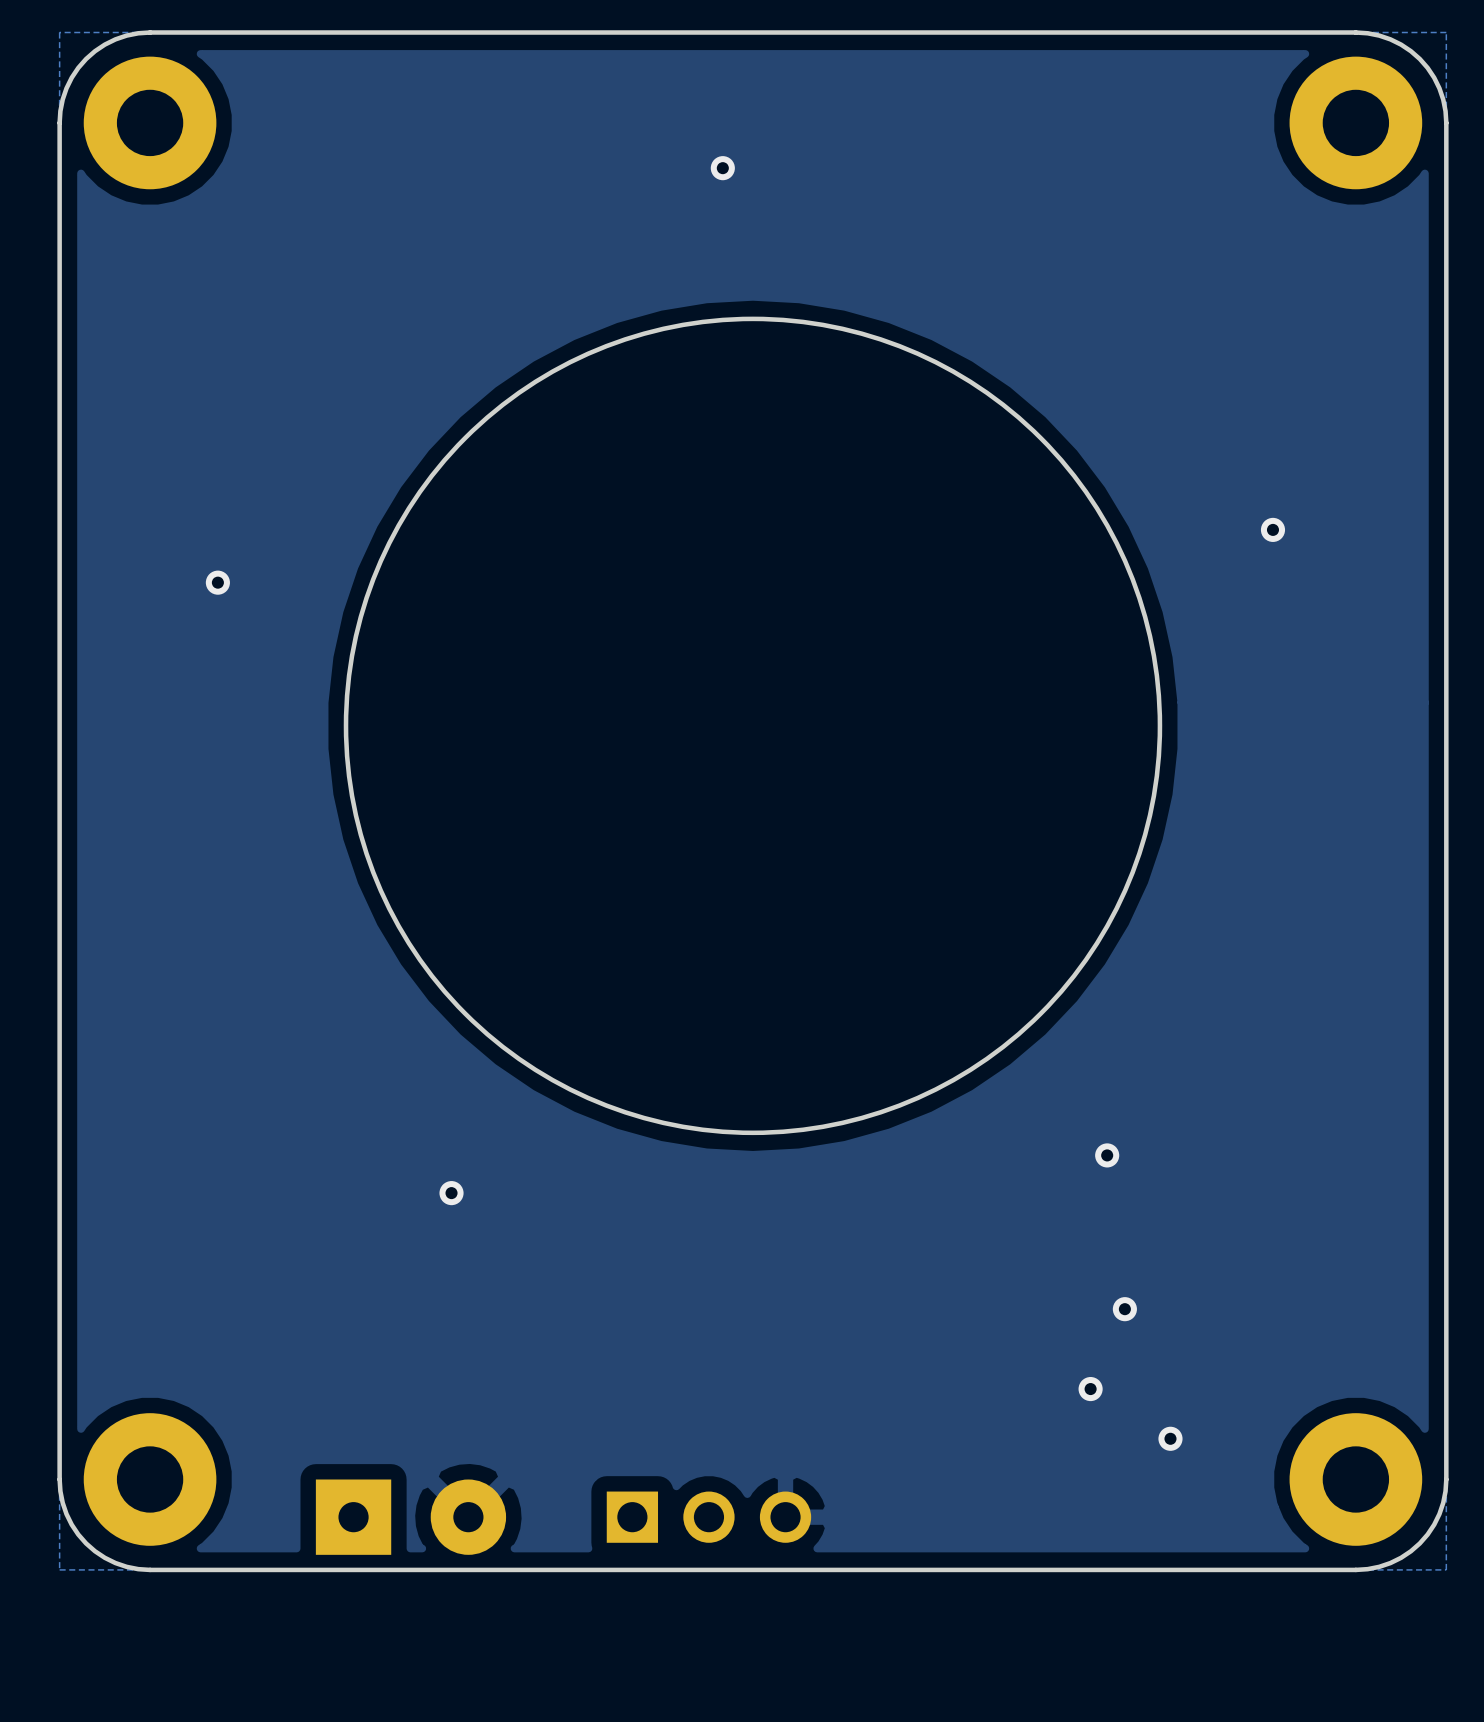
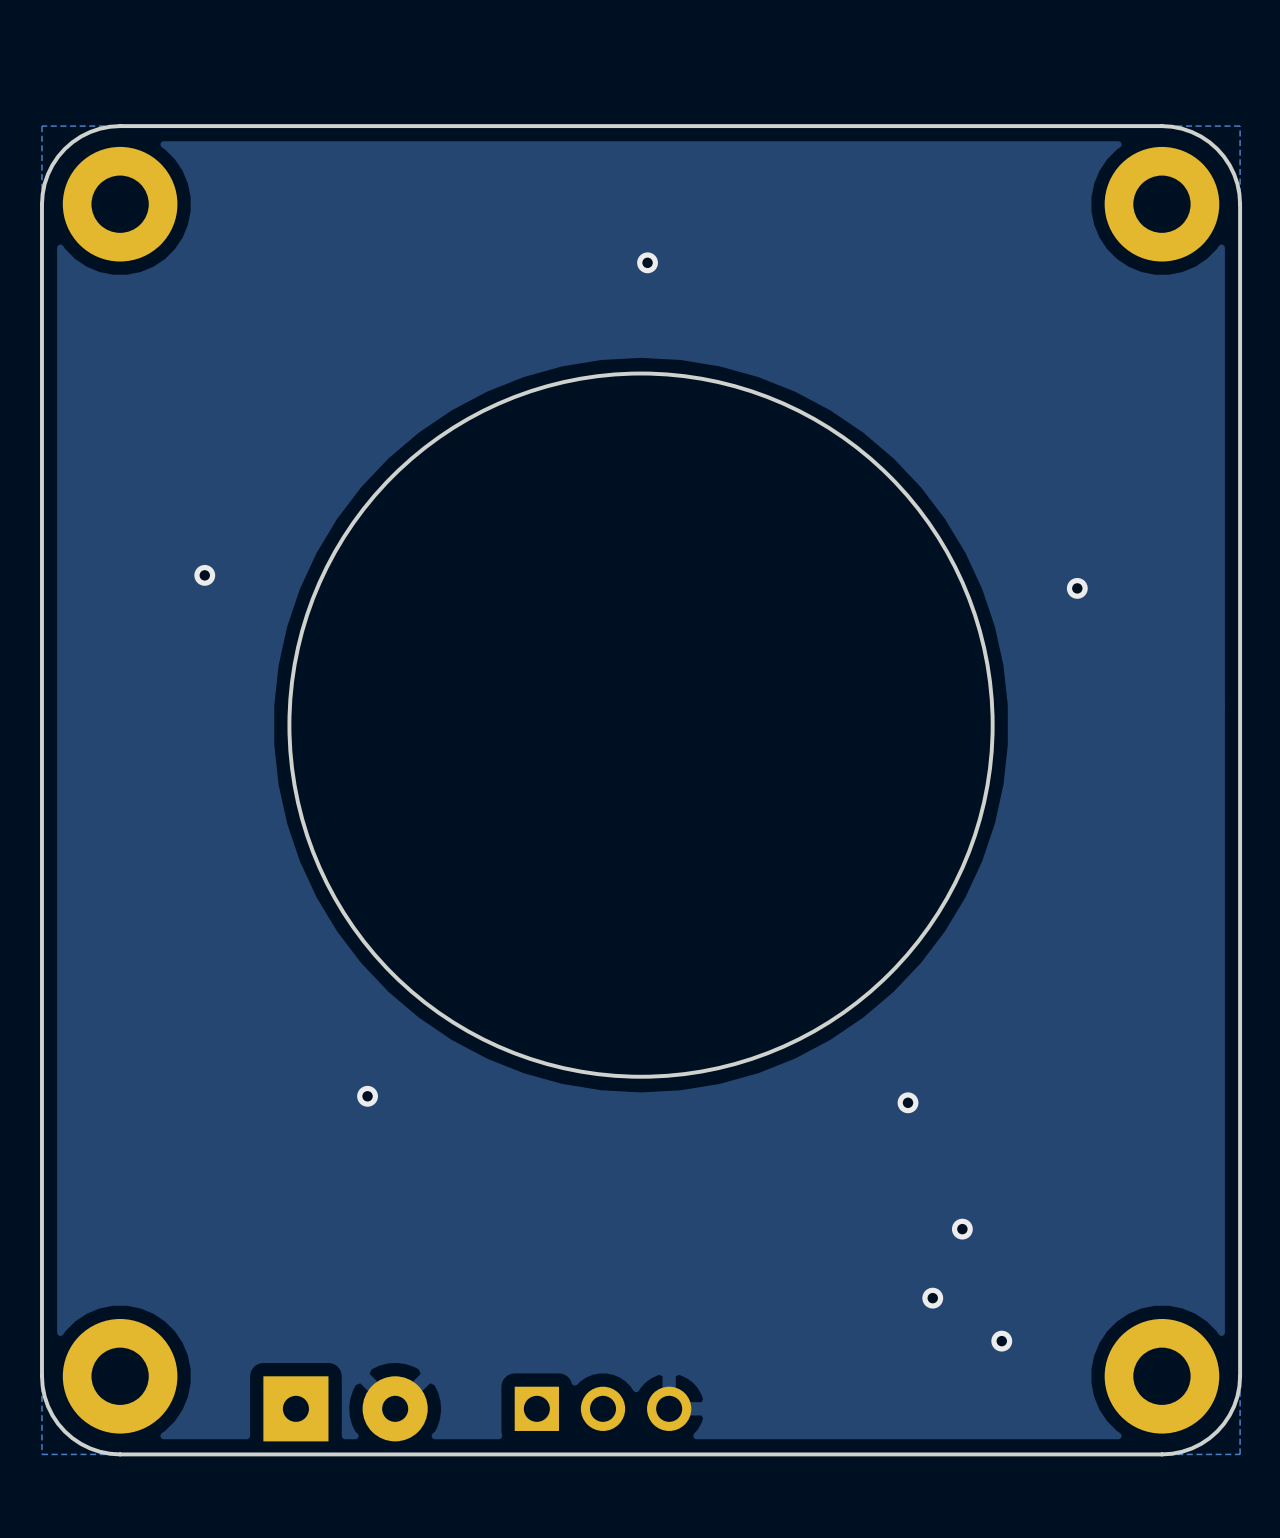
via position: (722, 168) -> (647, 262)
via position: (1272, 529) -> (1077, 588)
via position: (217, 582) -> (204, 575)
via position: (1107, 1155) -> (908, 1102)
via position: (451, 1193) -> (367, 1096)

